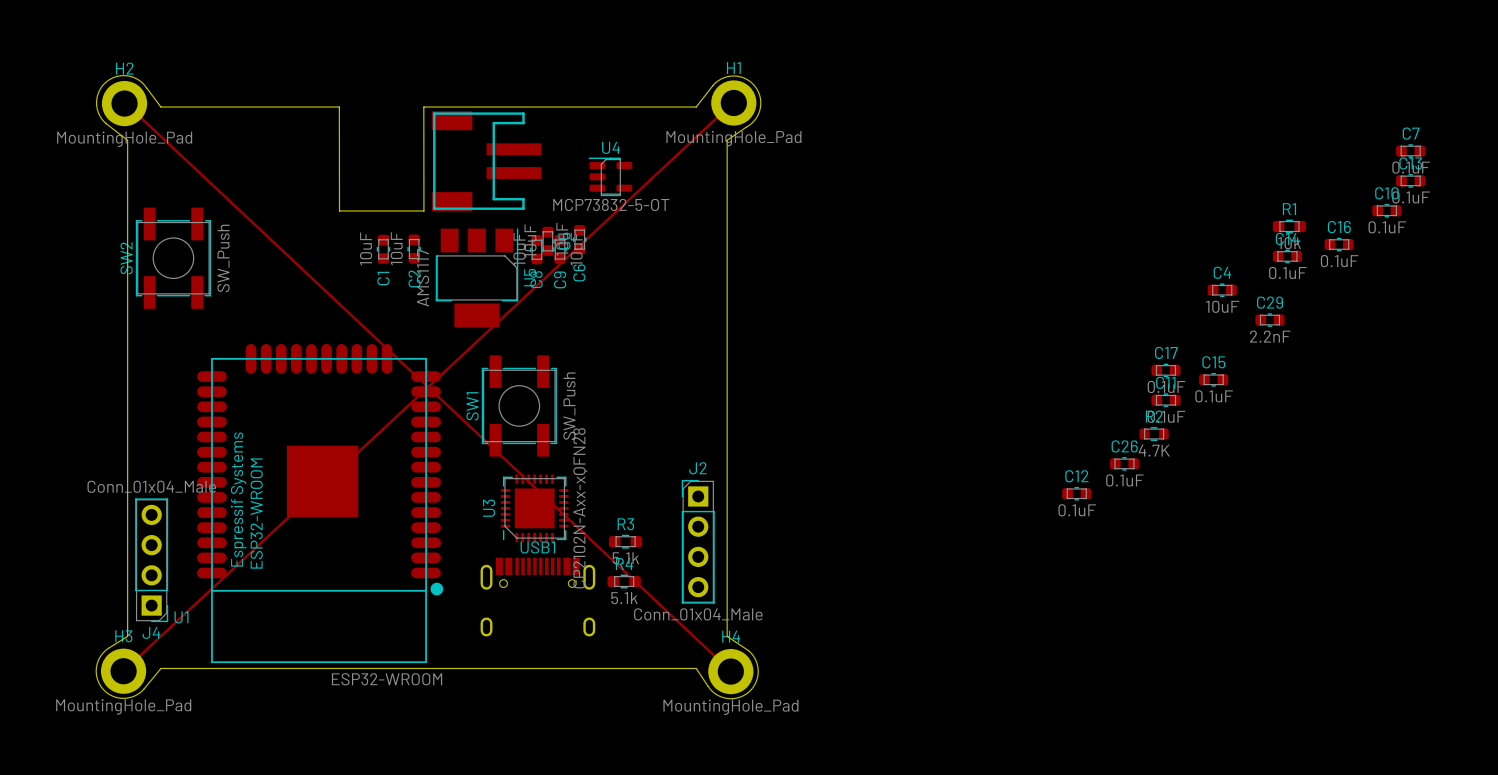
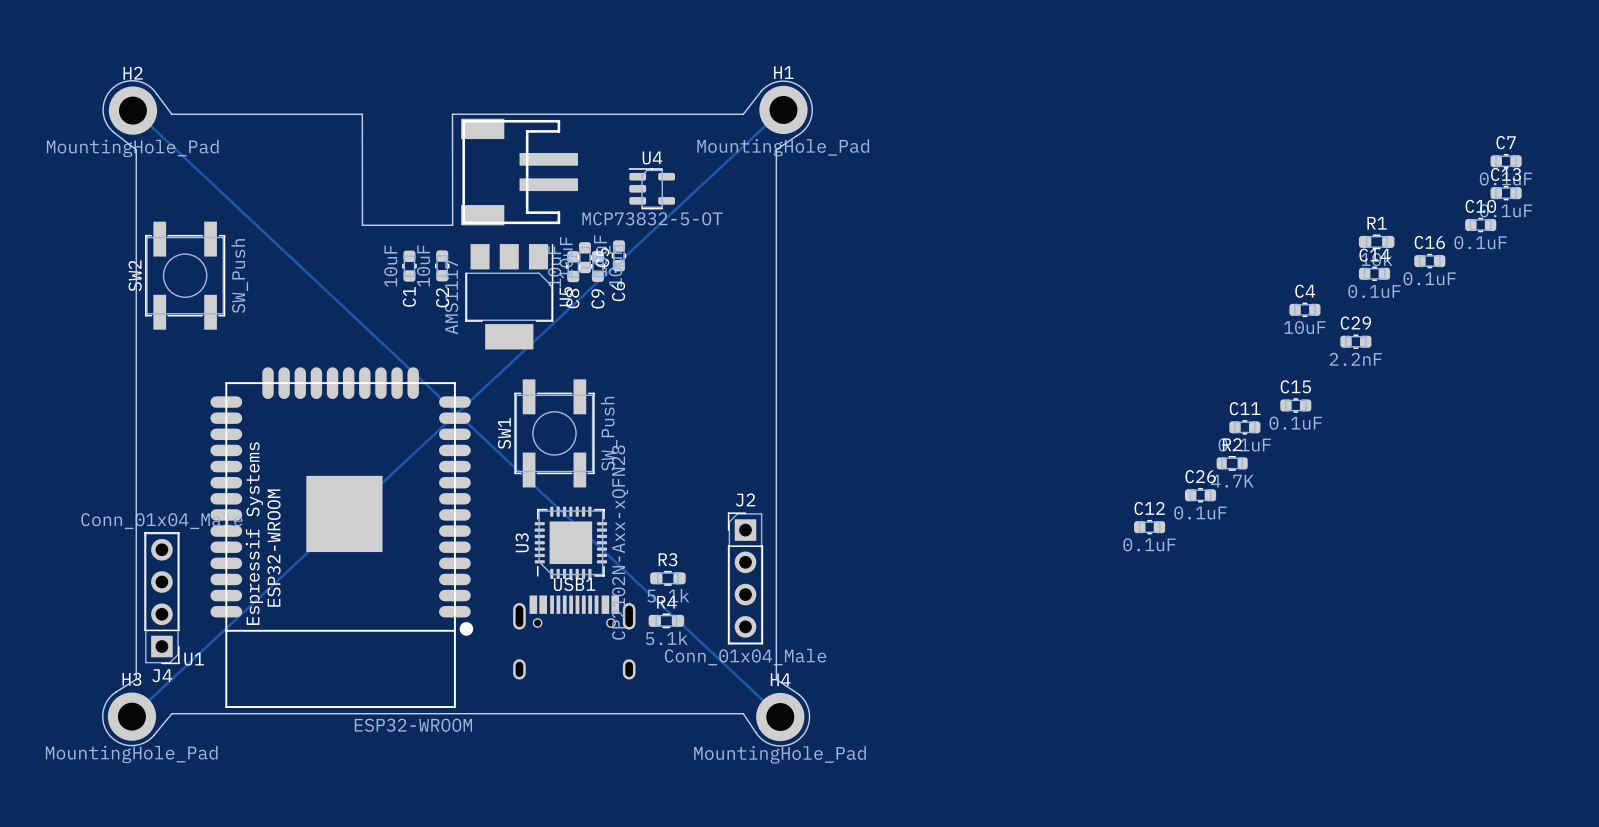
C17: 0.1uF (1165, 370) -> none

